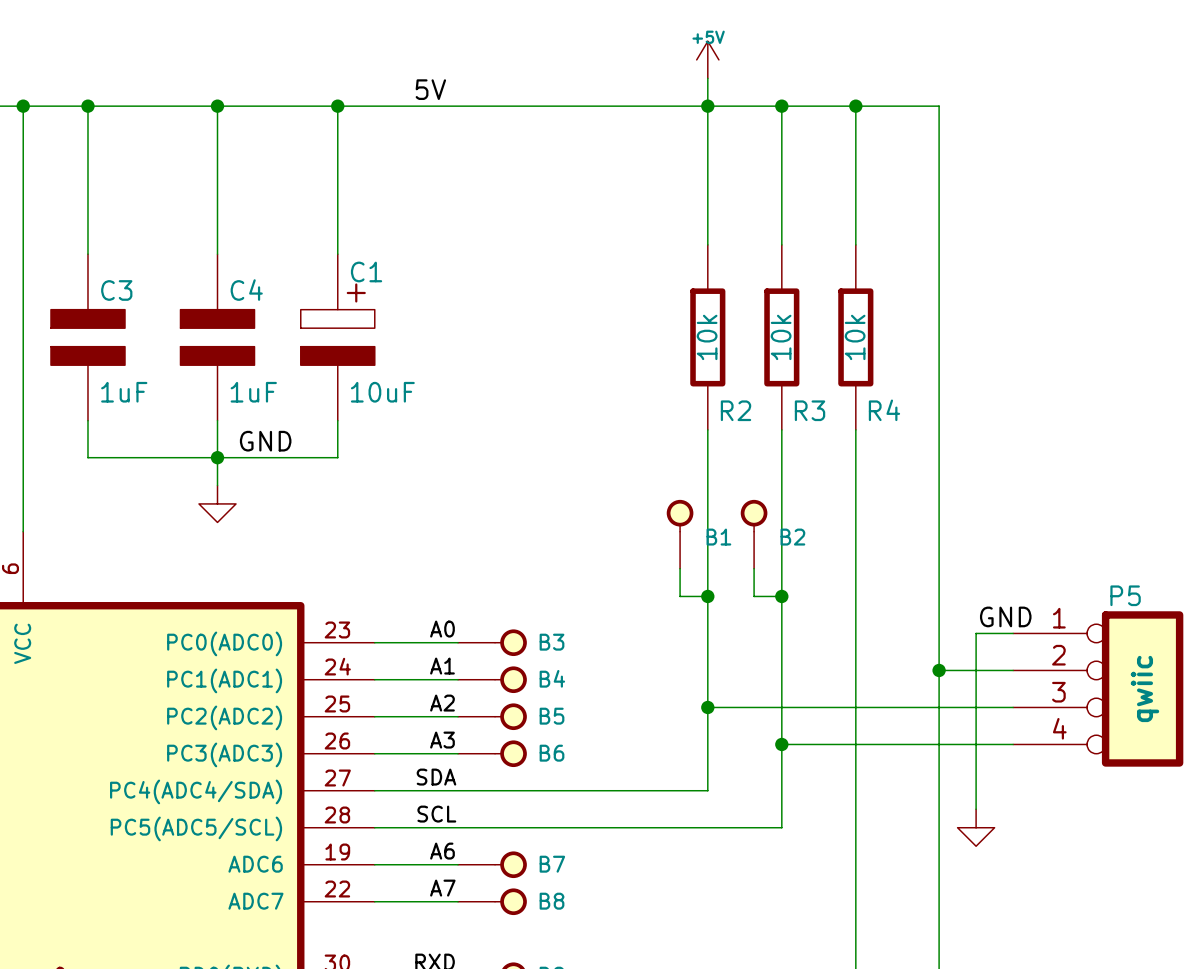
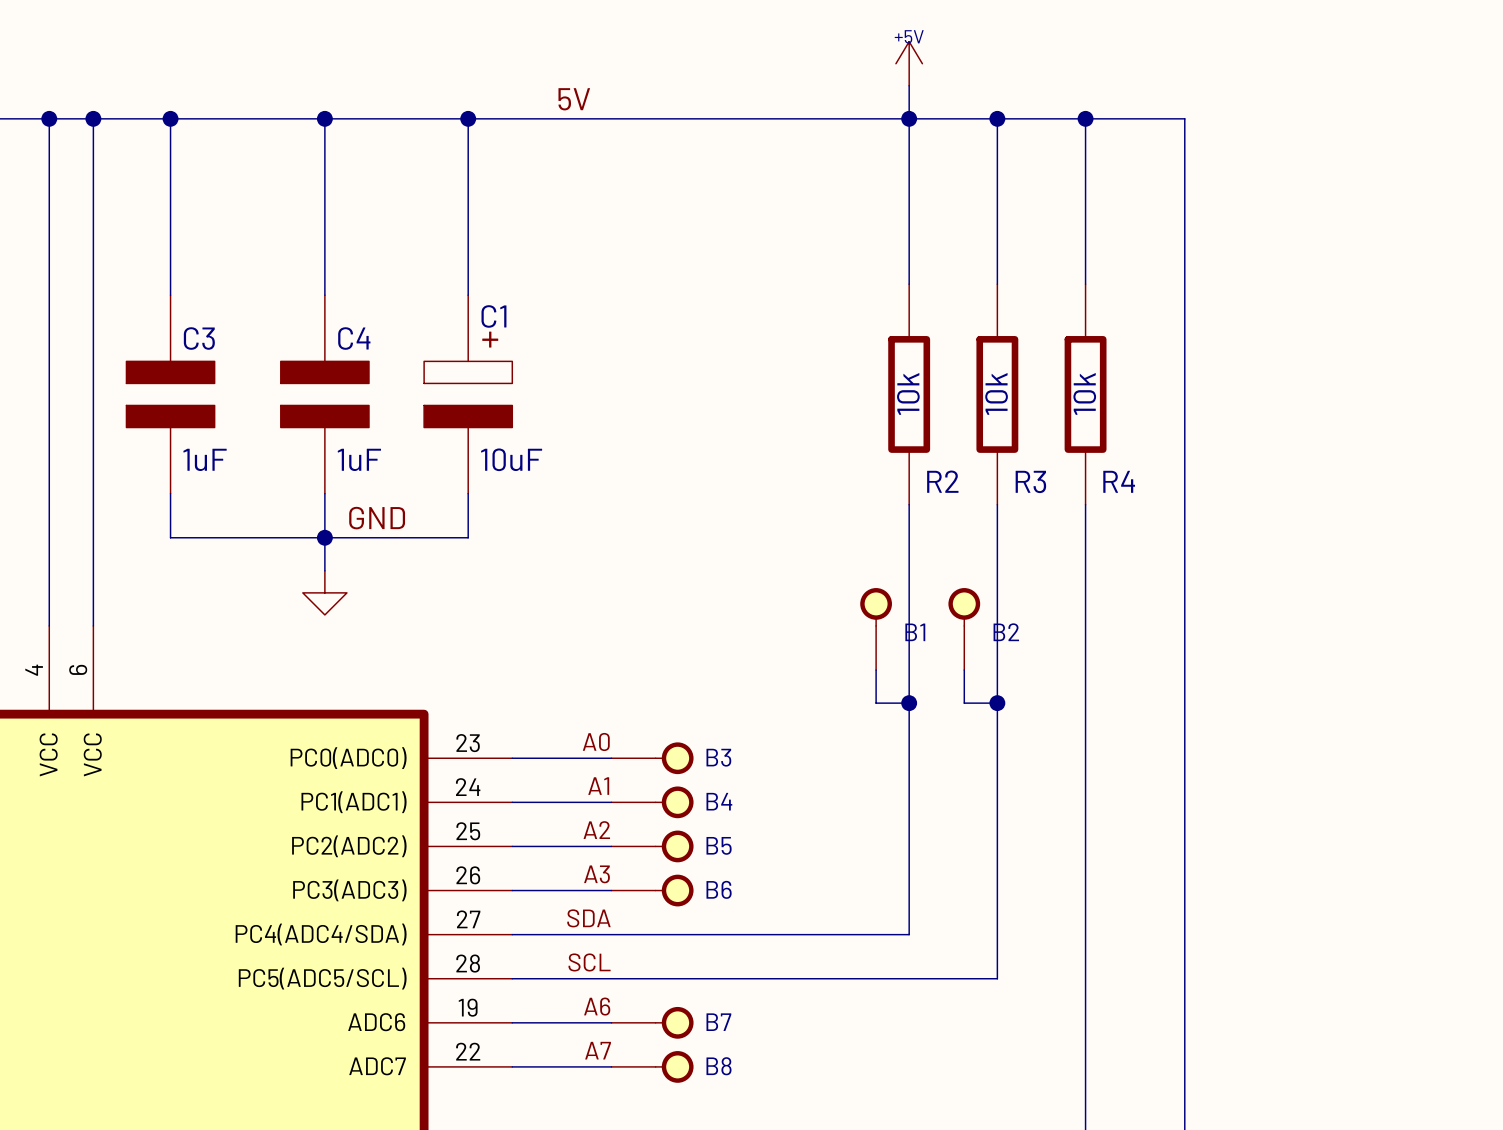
label: GND (1005, 616) -> none
wire: (1013, 633) (976, 633) (976, 809) -> none
wire: (939, 670) (1013, 670) -> none
junction: (939, 670) -> none
P5: qwiic (1098, 688) -> none
wire: (707, 707) (1013, 707) -> none
junction: (707, 707) -> none
wire: (781, 744) (1013, 744) -> none
junction: (781, 744) -> none
power symbol: (976, 827) -> none

